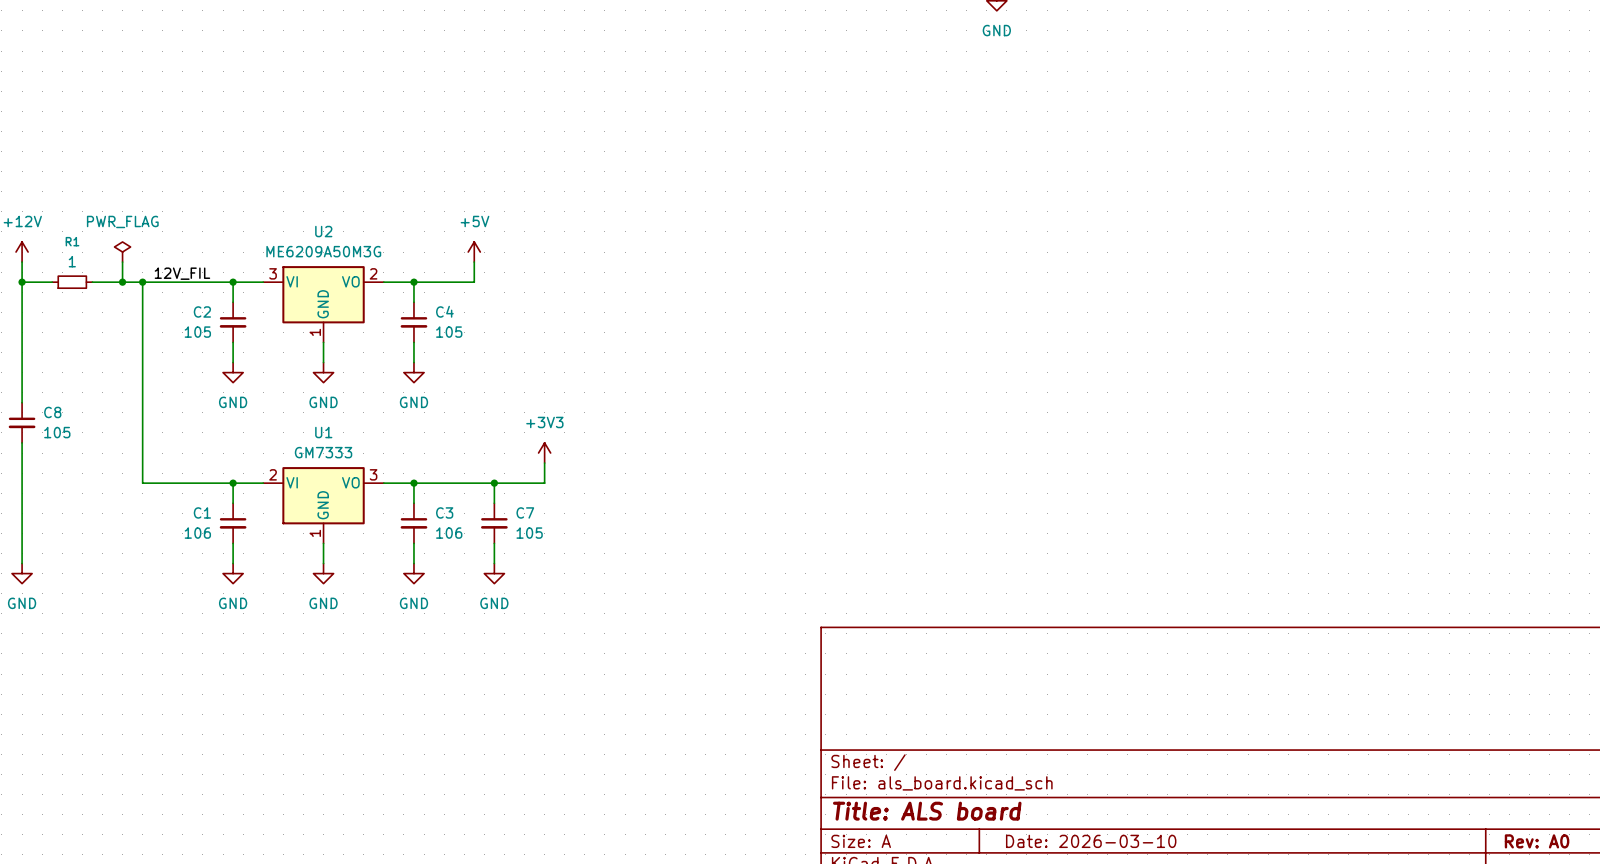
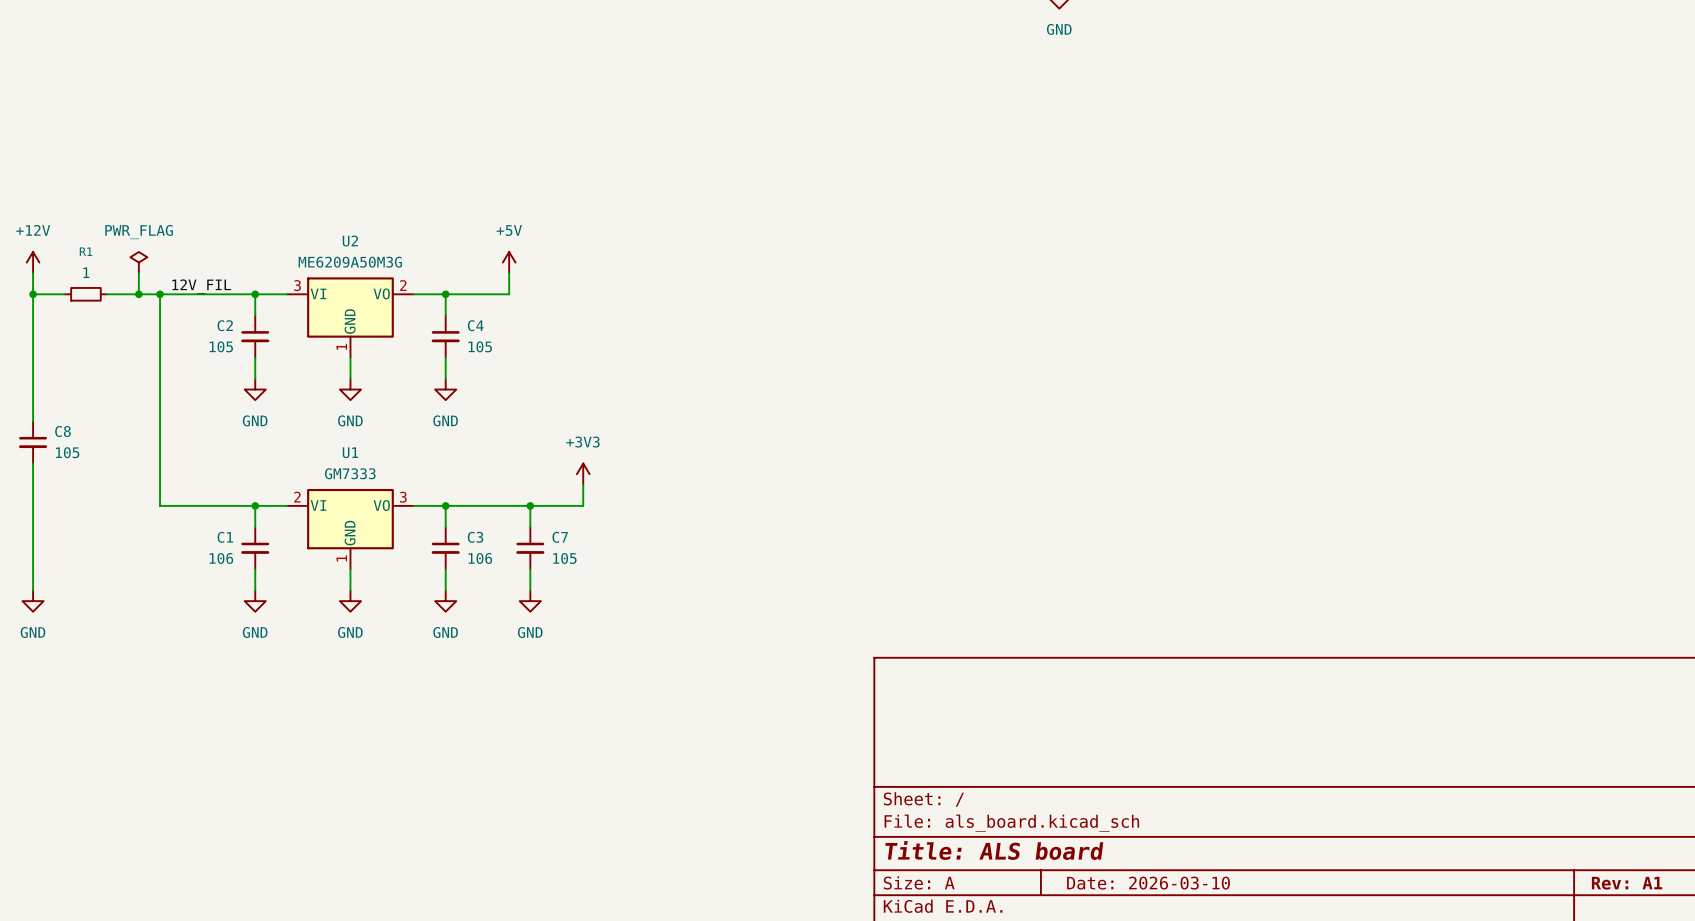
title block: Rev: A0 (1537, 841) -> Rev: A1 (1627, 883)

